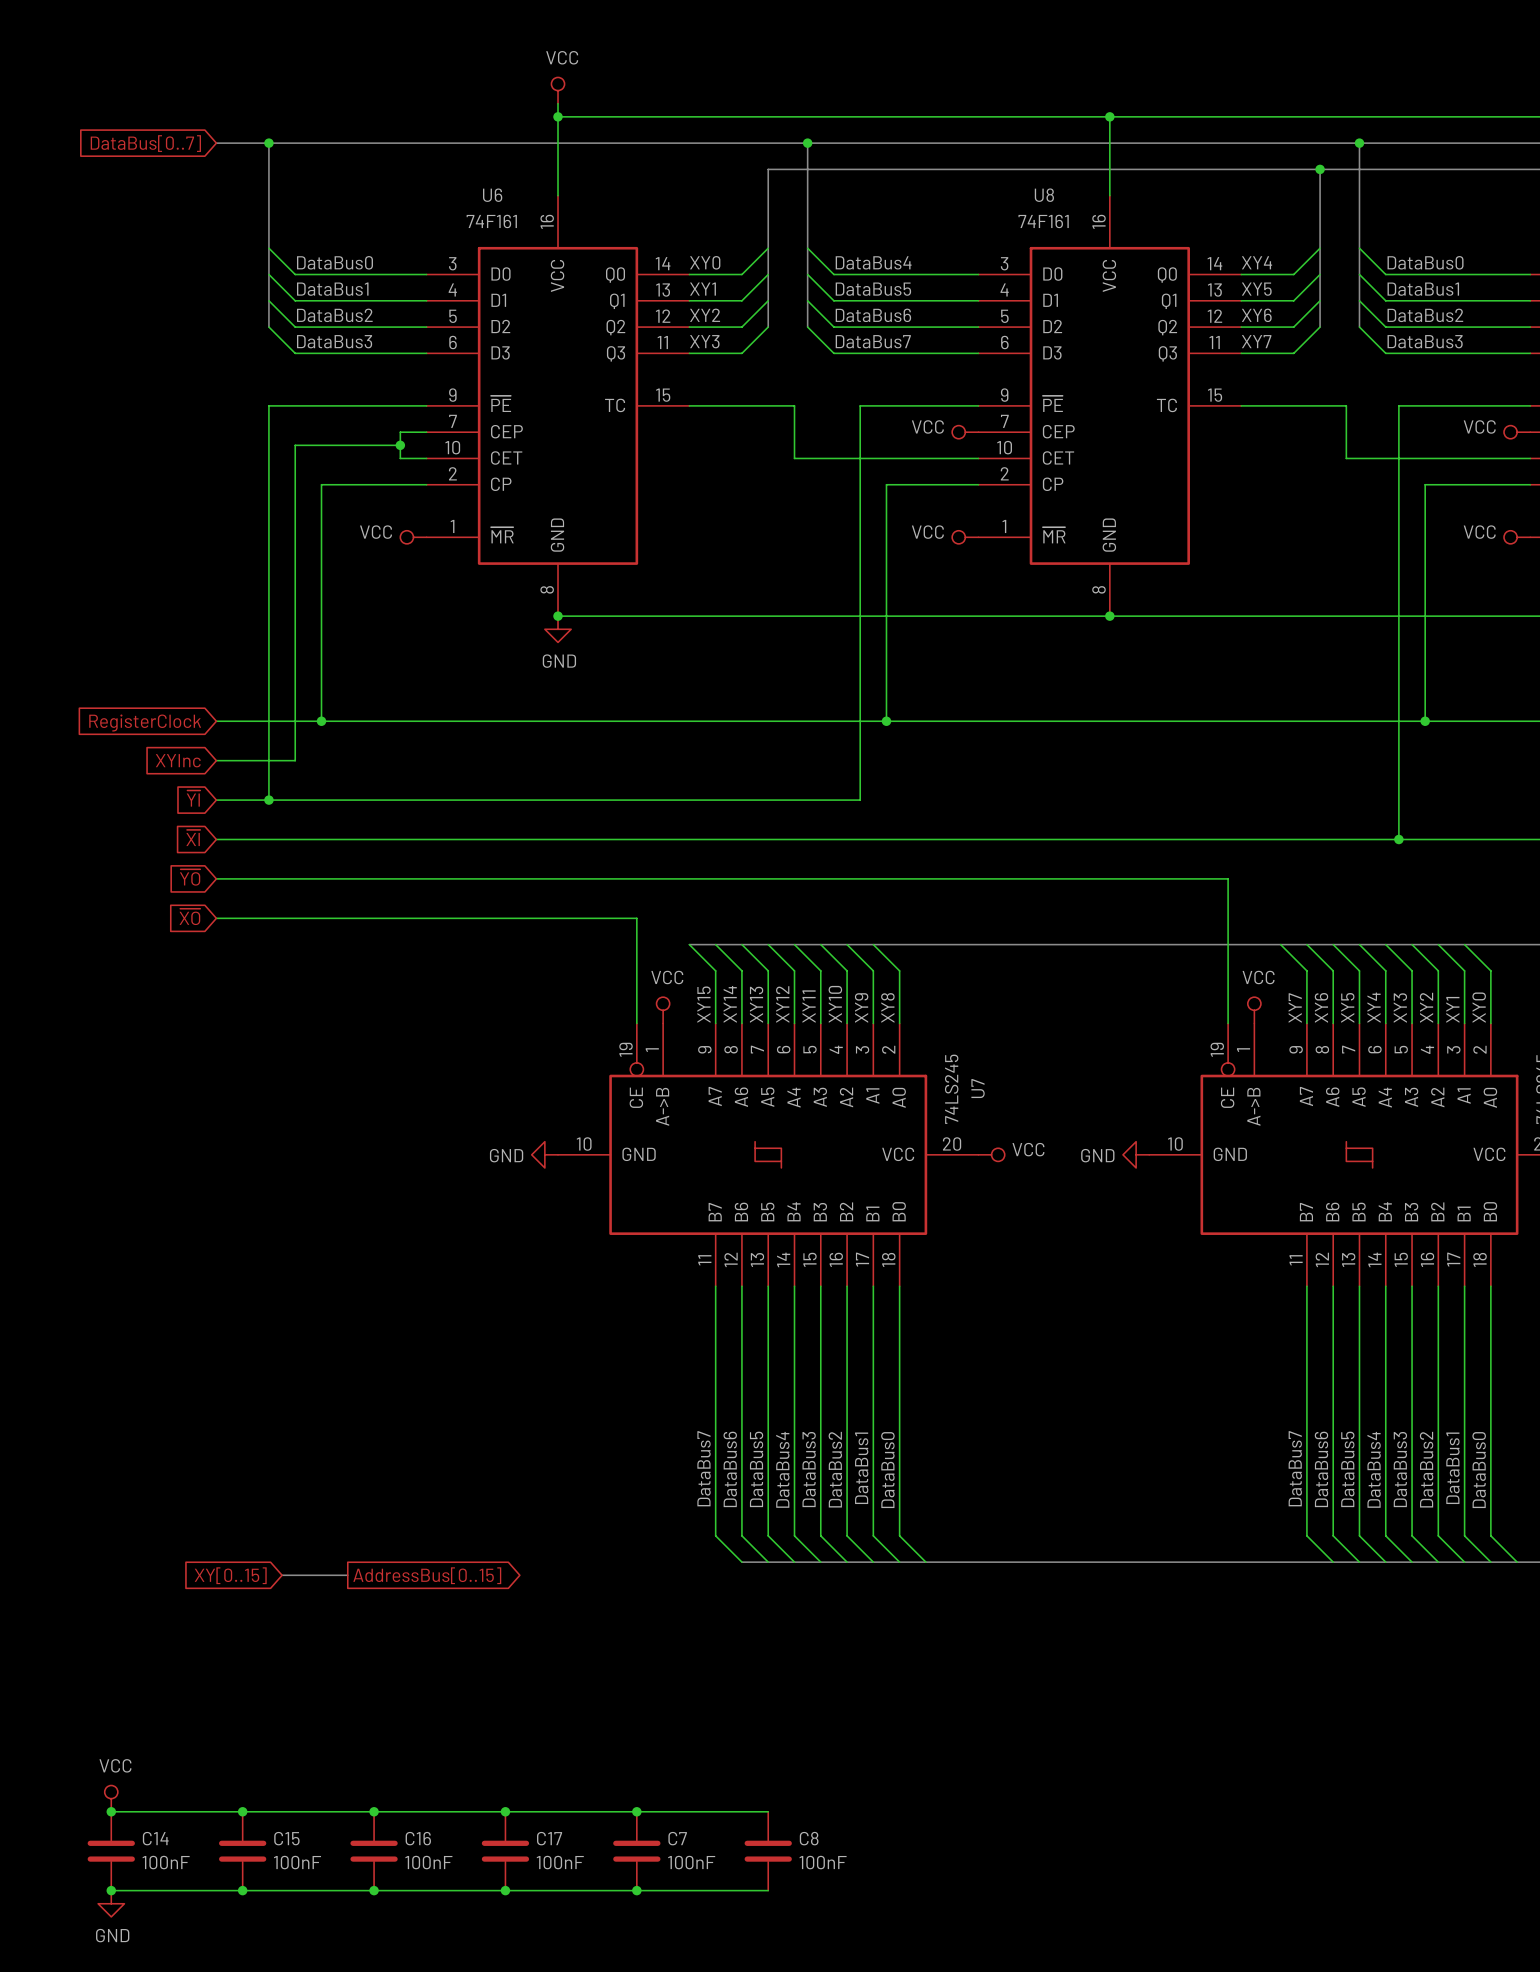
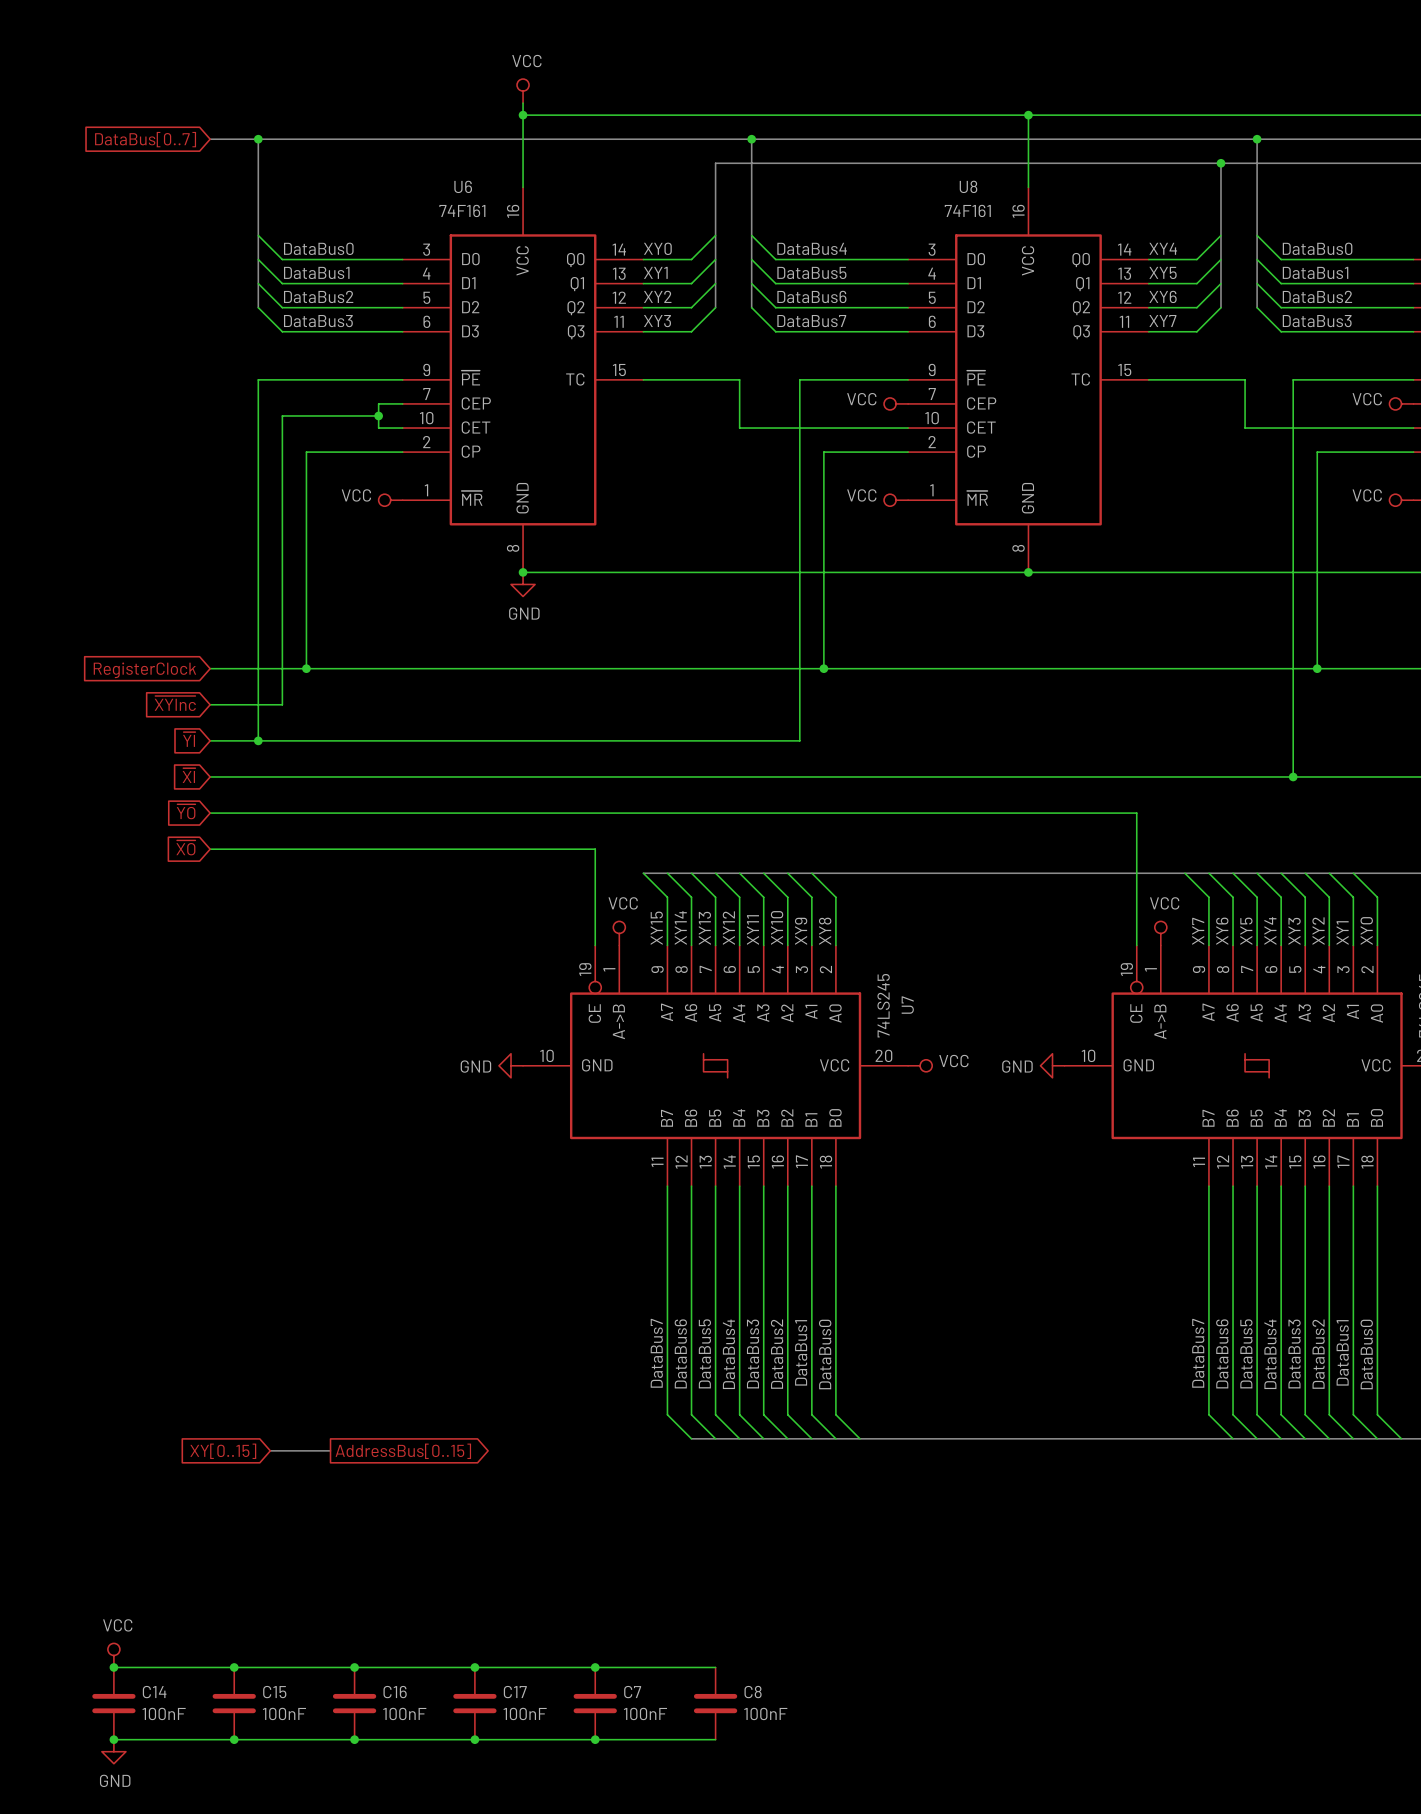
global label: XYInc (178, 760) -> ~{XYInc} (175, 703)

